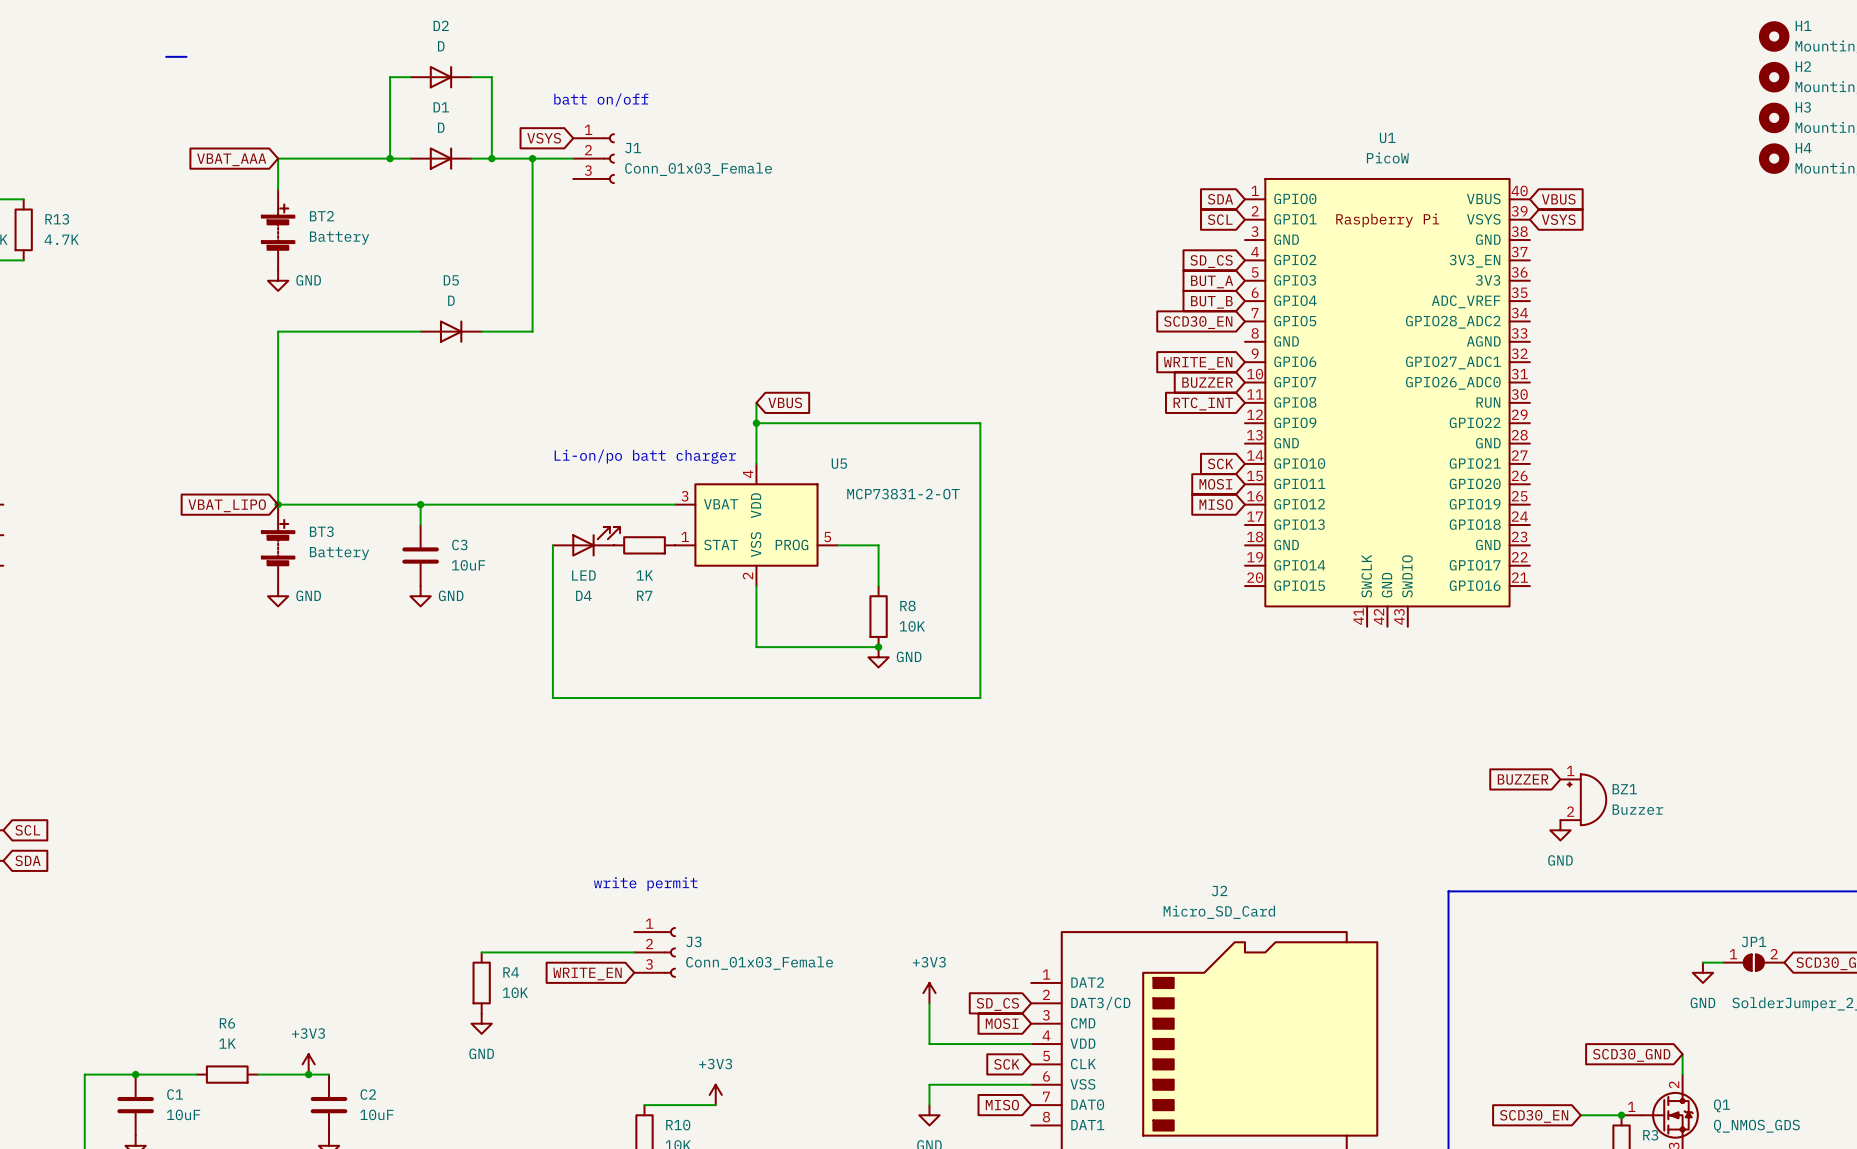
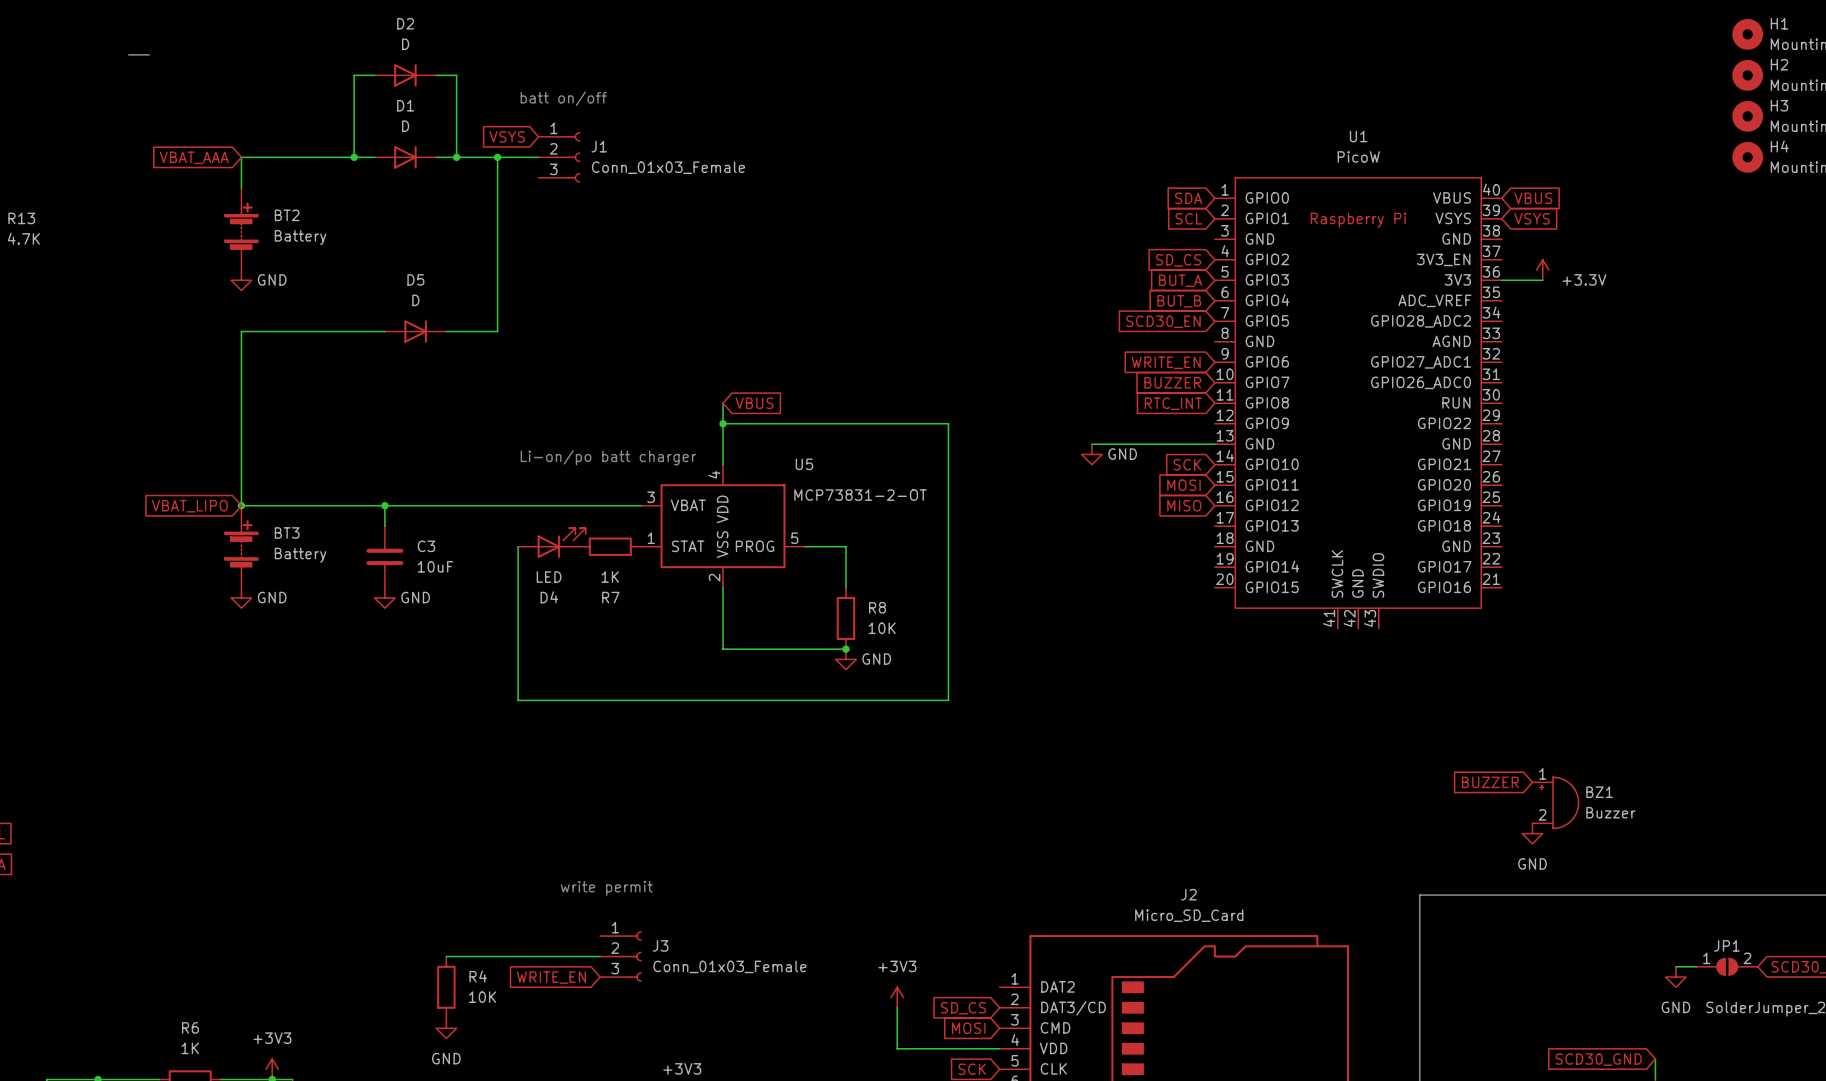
power symbol: none -> +3.3V (1542, 270)
wire: none -> (1501, 280) (1542, 280)
wire: none -> (1091, 444) (1214, 444)
power symbol: none -> GND (1091, 454)

